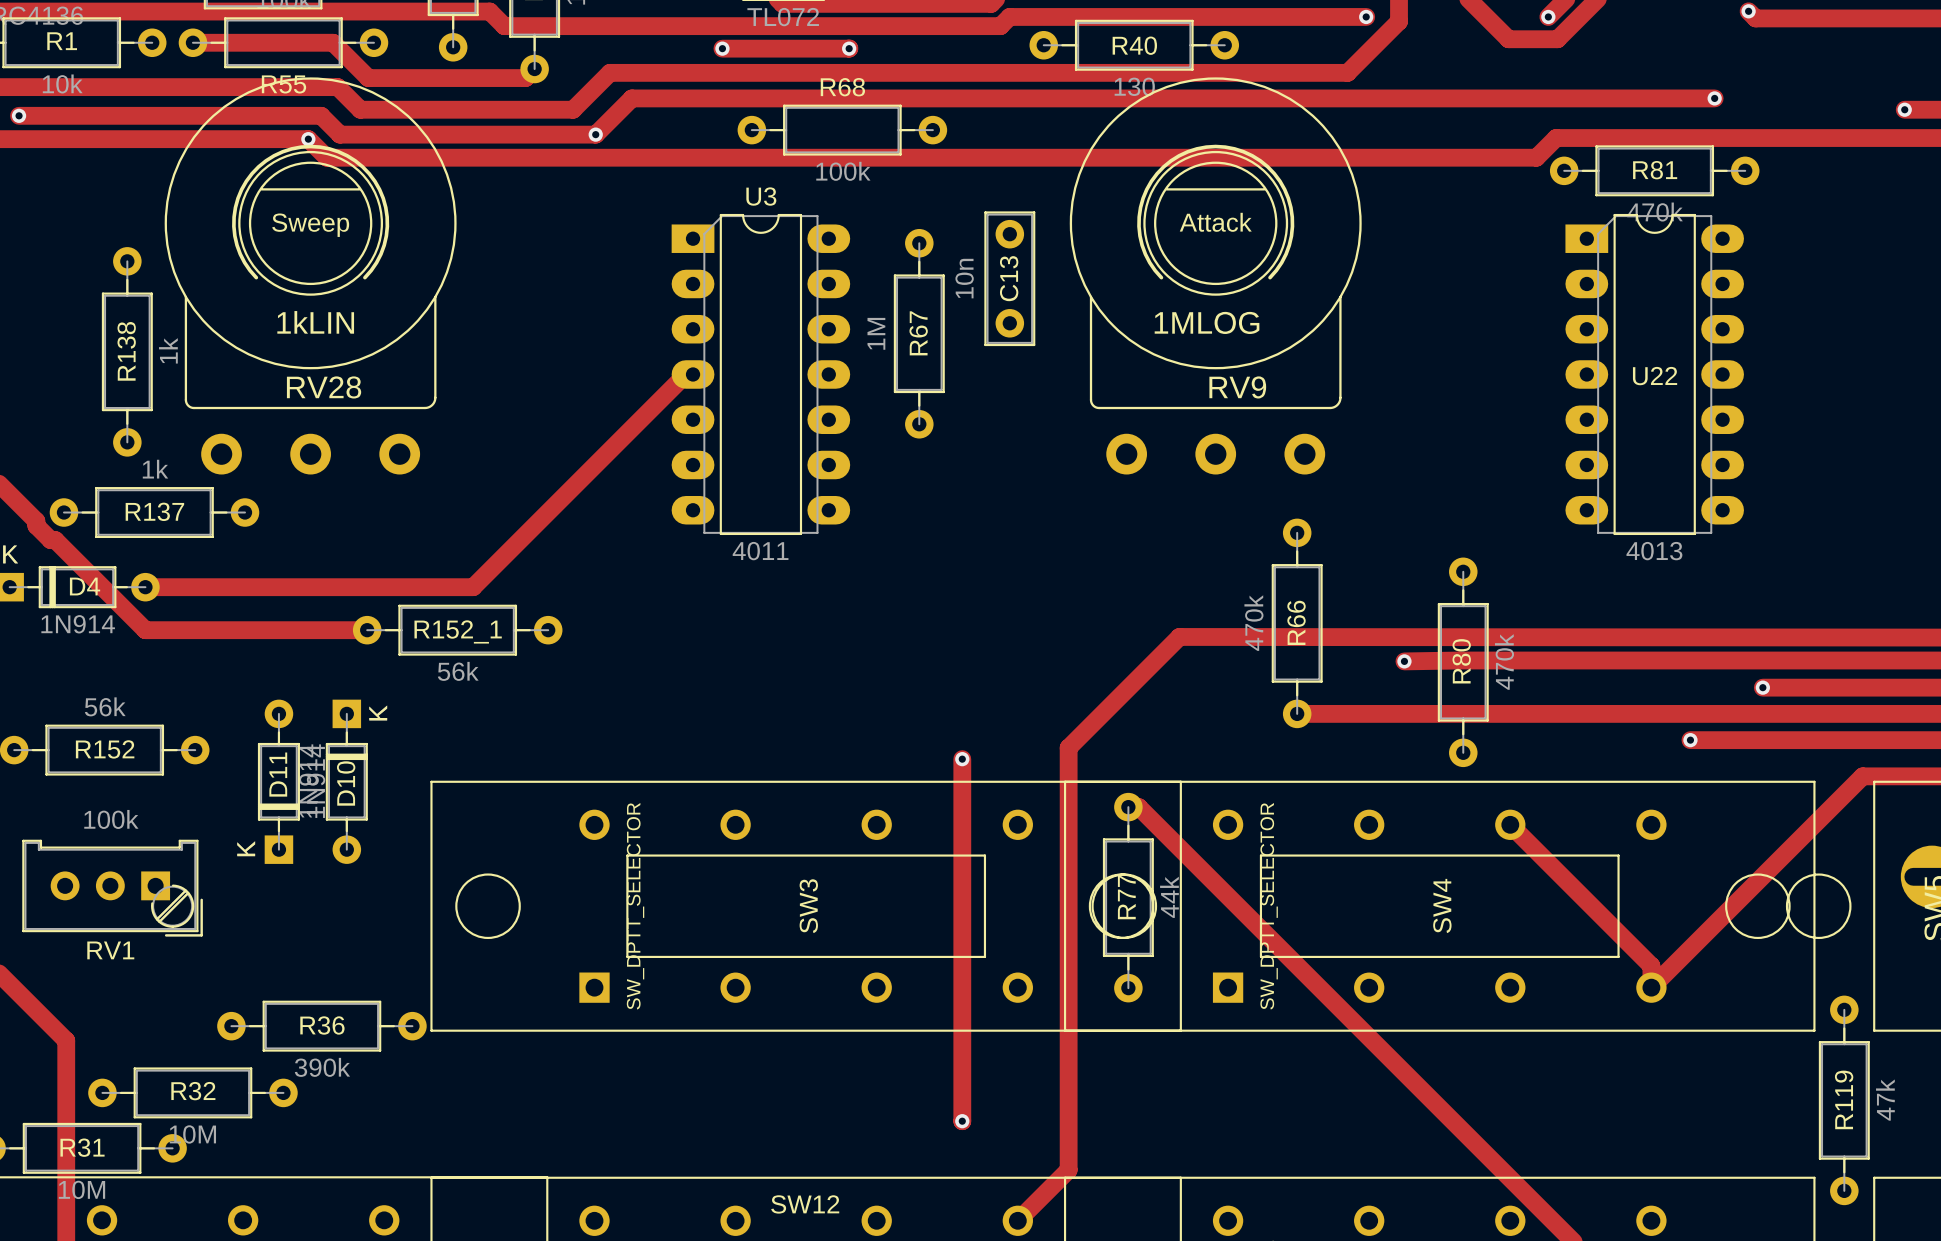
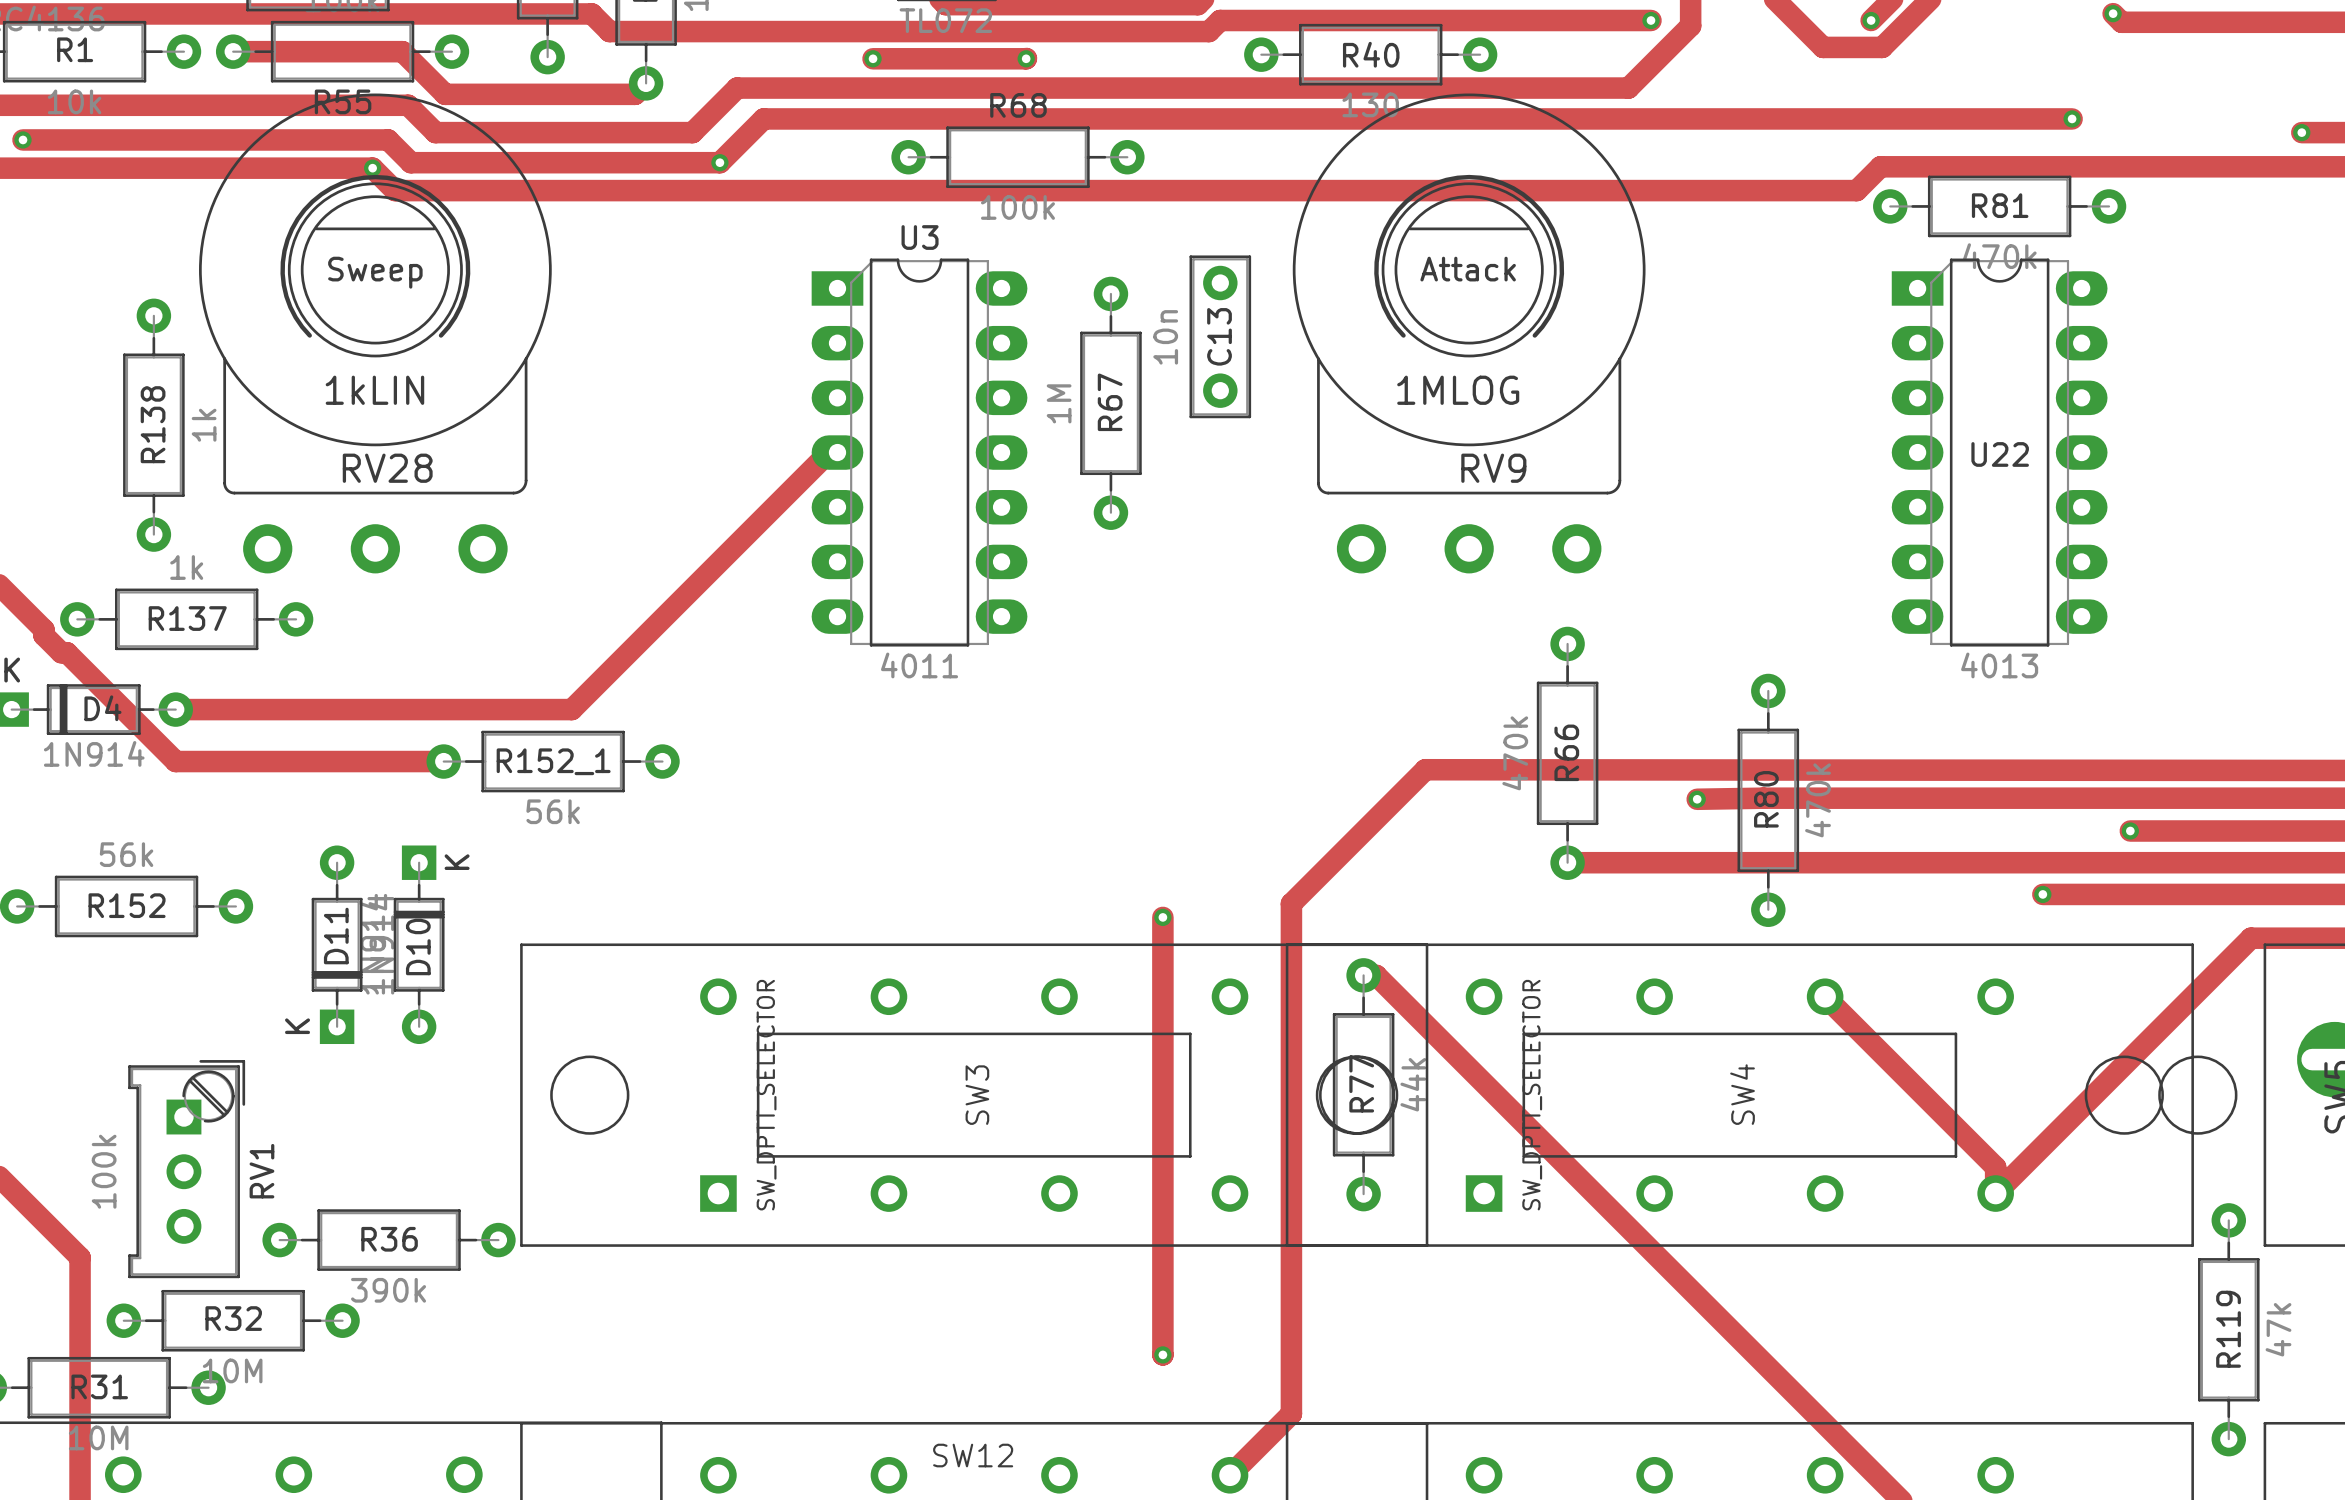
RV1 rotation: 0° (112, 888) -> 90° counterclockwise (186, 1169)

